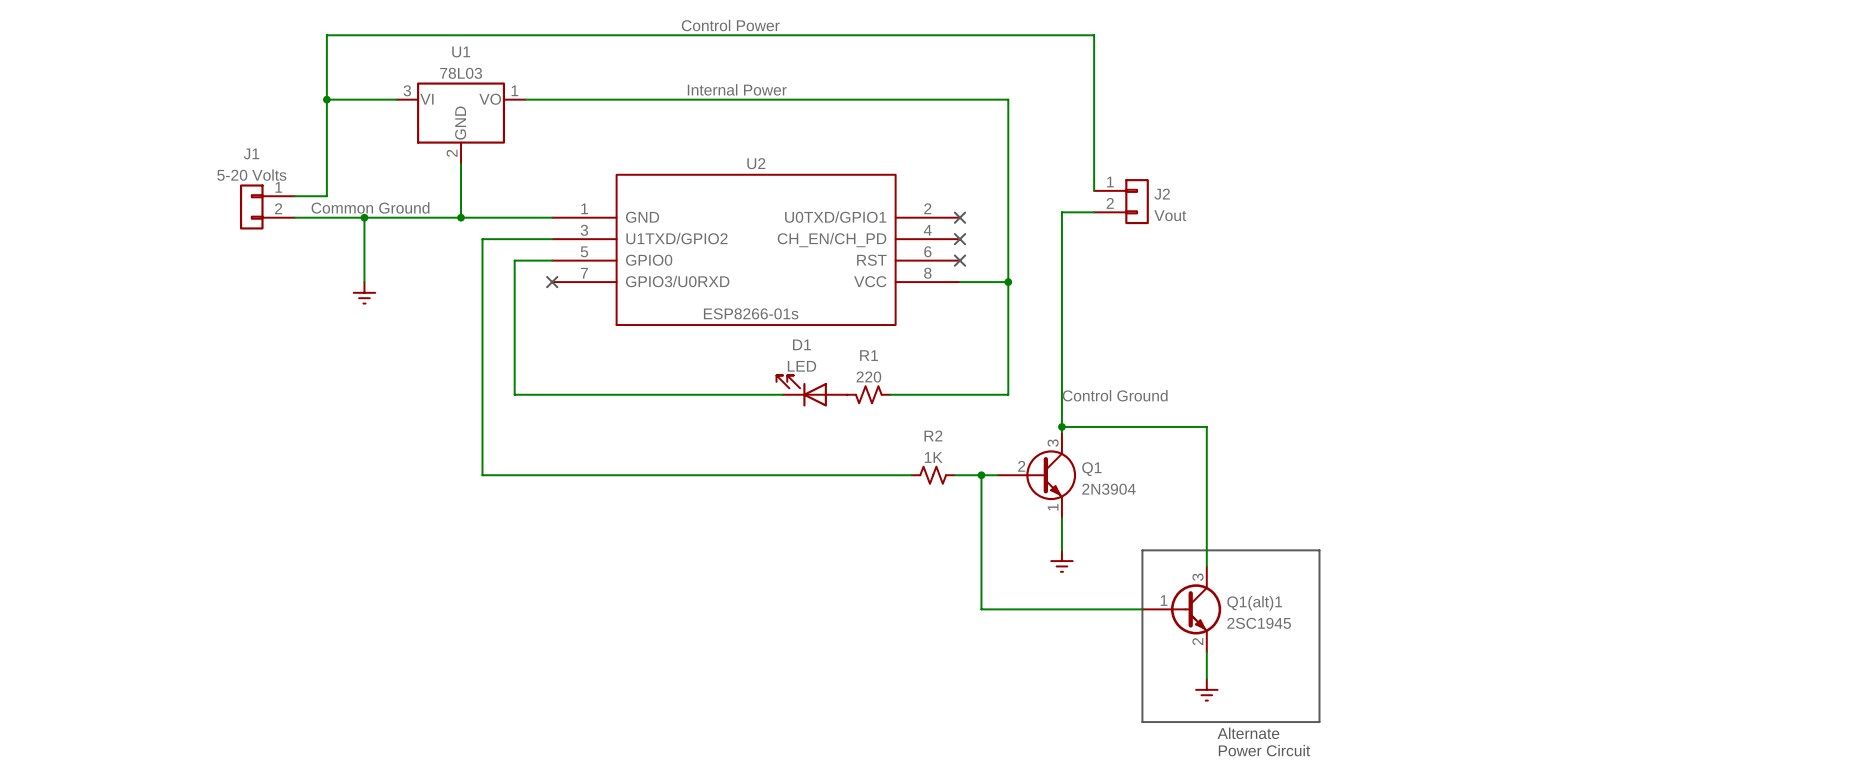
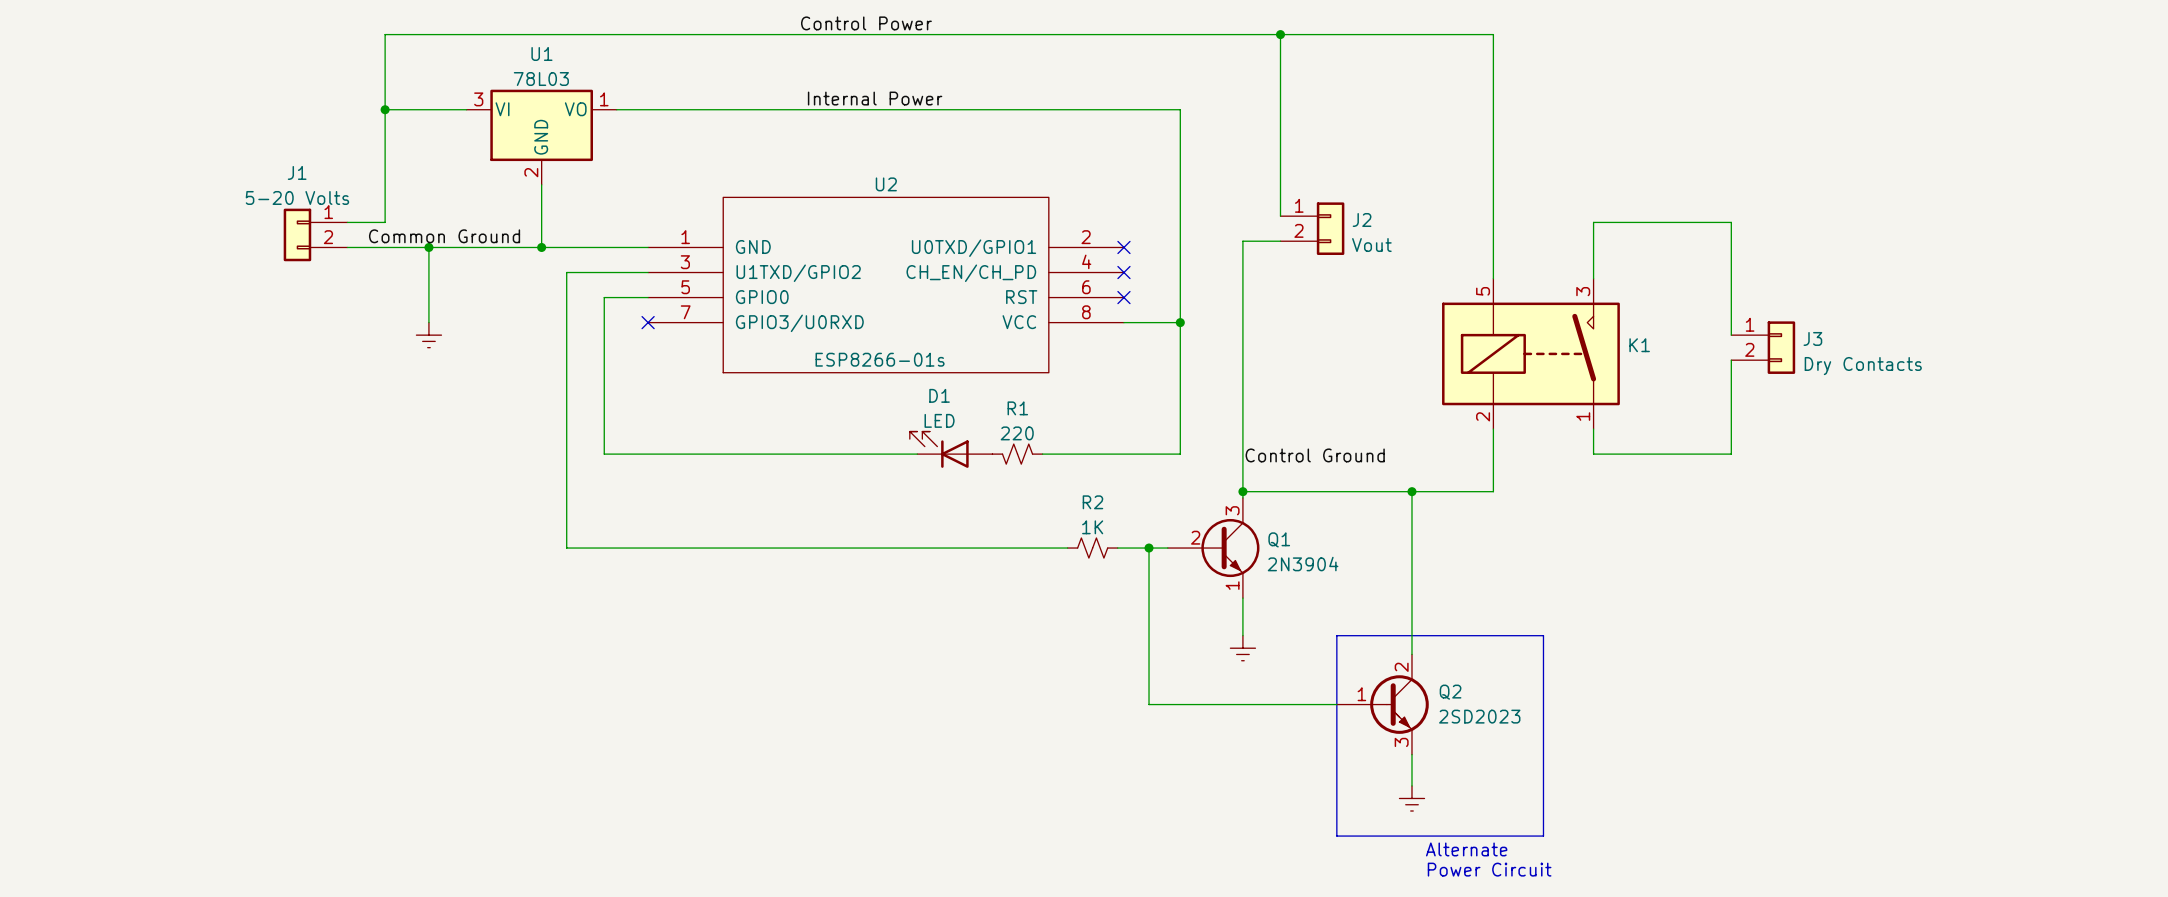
wire: none -> (1280, 34) (1493, 34) (1493, 278)
junction: none -> (1280, 34)
wire: none -> (1593, 278) (1593, 222) (1731, 222) (1731, 335)
J3: none -> Dry Contacts (1763, 347)
K1: none -> (1530, 353)
wire: none -> (1731, 360) (1731, 454) (1593, 454) (1593, 429)
wire: none -> (1493, 429) (1493, 491) (1411, 491)
junction: none -> (1411, 491)
Q1(alt)1 pin number: 3 (1197, 577) -> 2 (1401, 667)
Q1(alt)1 name: Q1(alt)1 (1254, 603) -> Q2 (1450, 692)
Q1(alt)1 value: 2SC1945 (1259, 623) -> 2SD2023 (1479, 716)
Q1(alt)1 pin number: 2 (1197, 641) -> 3 (1401, 742)

